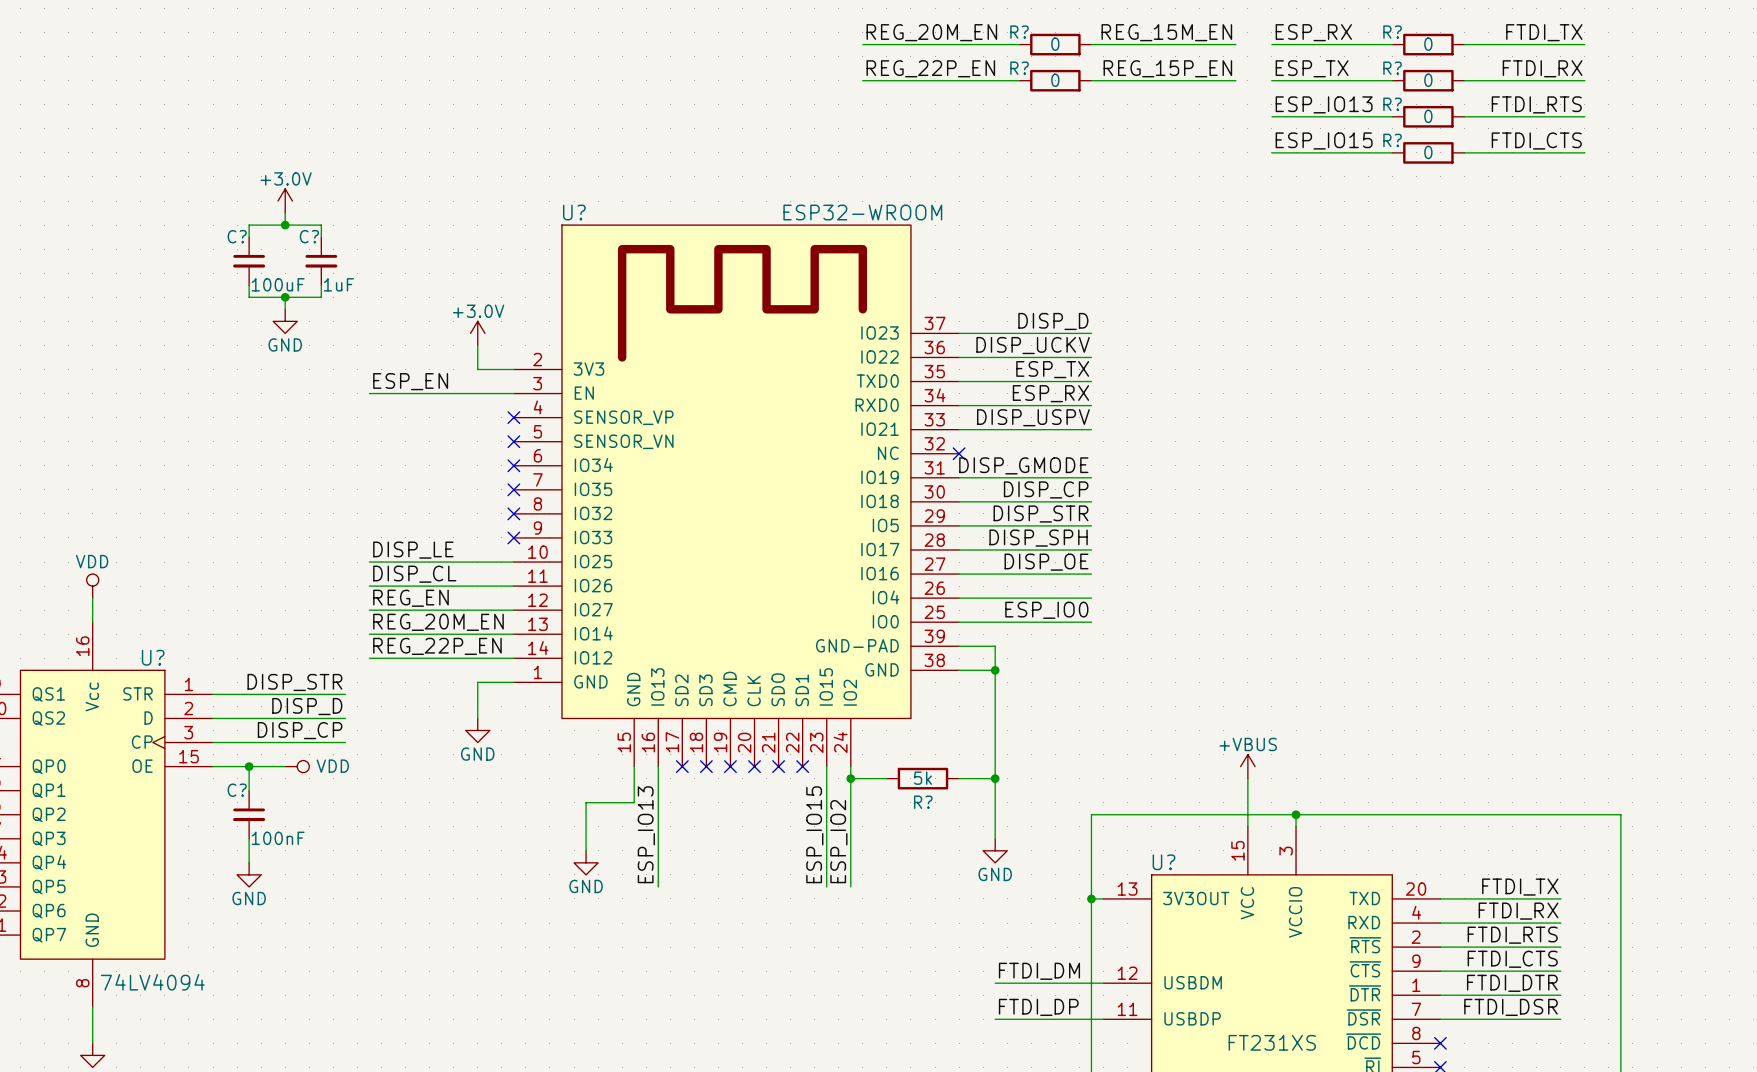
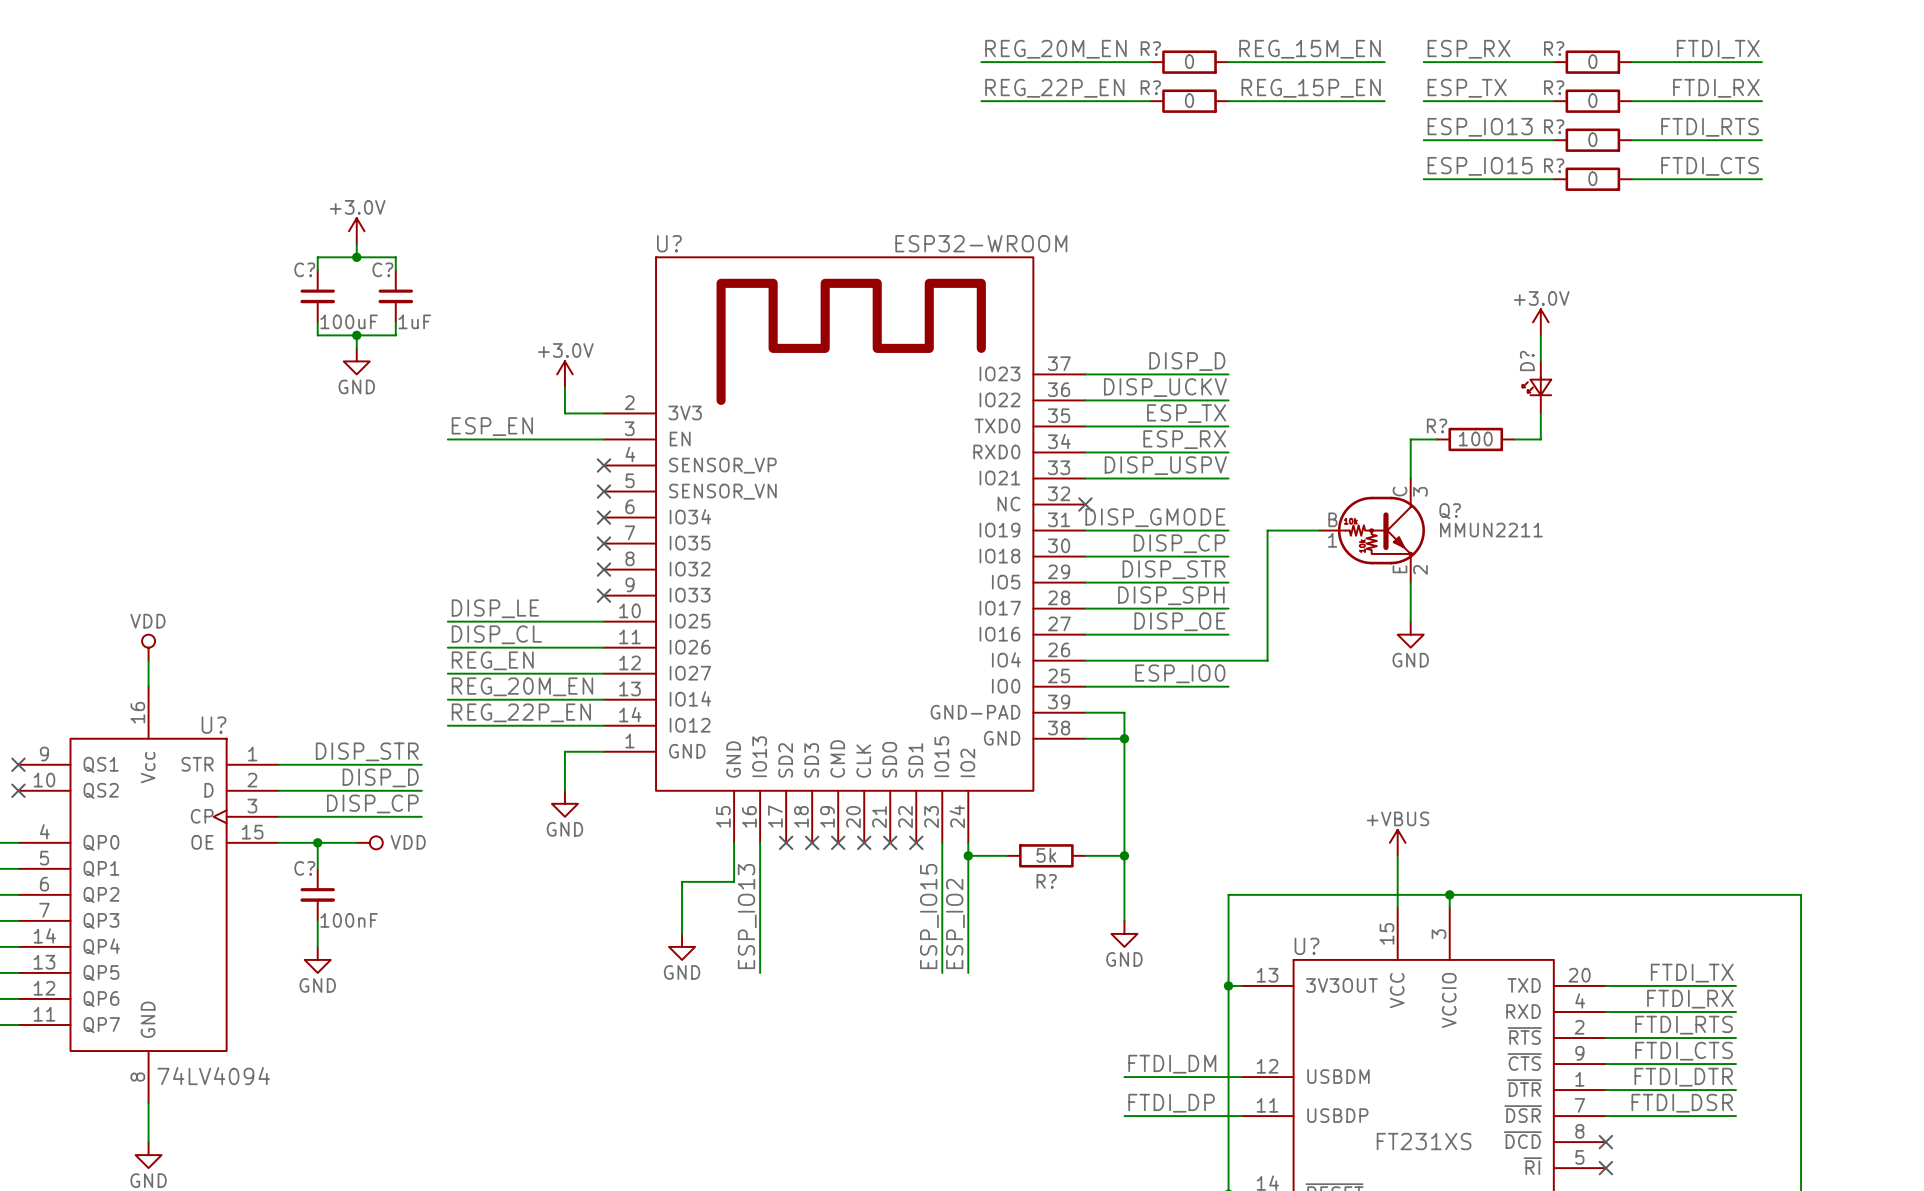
power symbol: none -> +3.0V (1540, 322)
wire: none -> (1540, 335) (1540, 361)
D?: none -> (1536, 387)
wire: none -> (1540, 413) (1540, 439) (1514, 439)
wire: none -> (1436, 439) (1410, 439) (1410, 478)
R?: none -> 100 (1475, 439)
wire: none -> (1319, 530) (1267, 530) (1267, 660) (1228, 660)
Q?: none -> MMUN2211 (1372, 530)
wire: none -> (1410, 582) (1410, 621)
power symbol: none -> GND (1410, 634)

